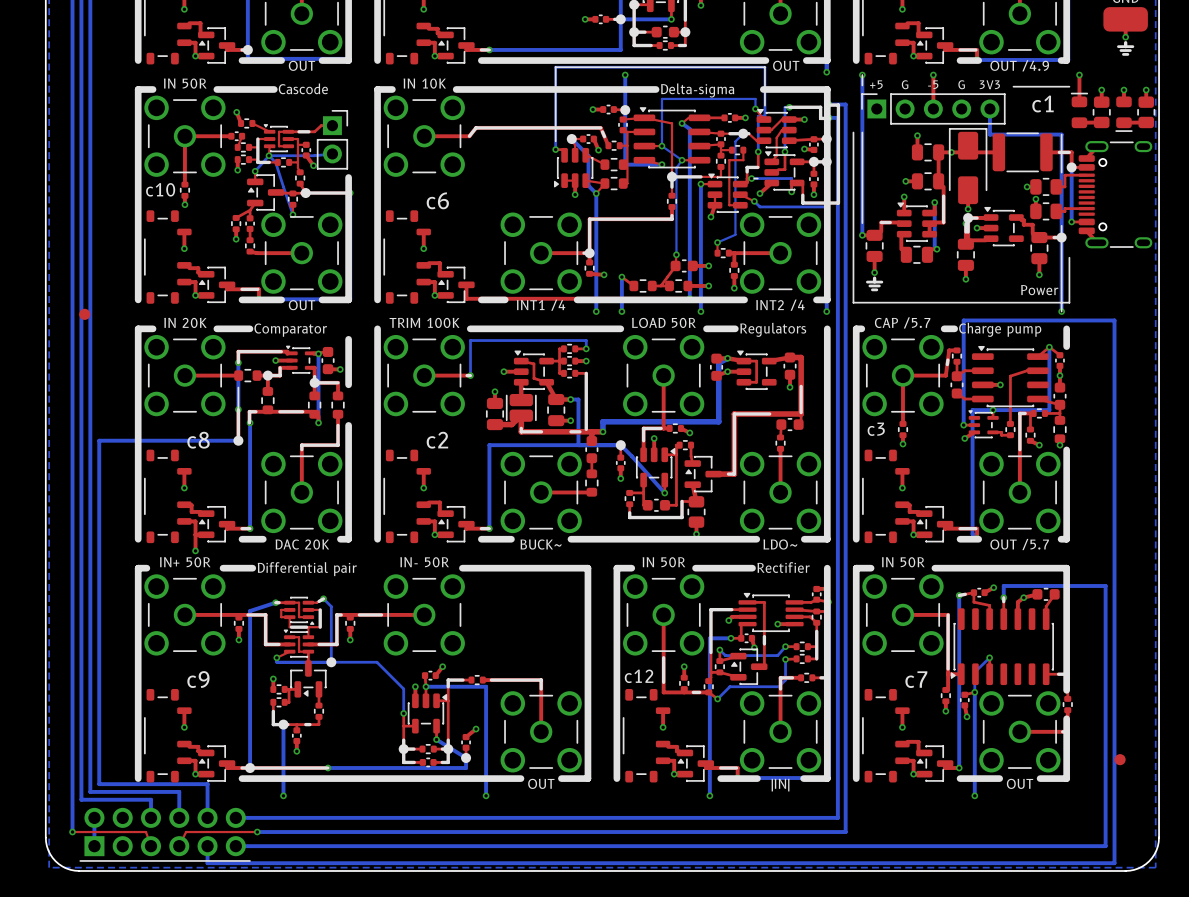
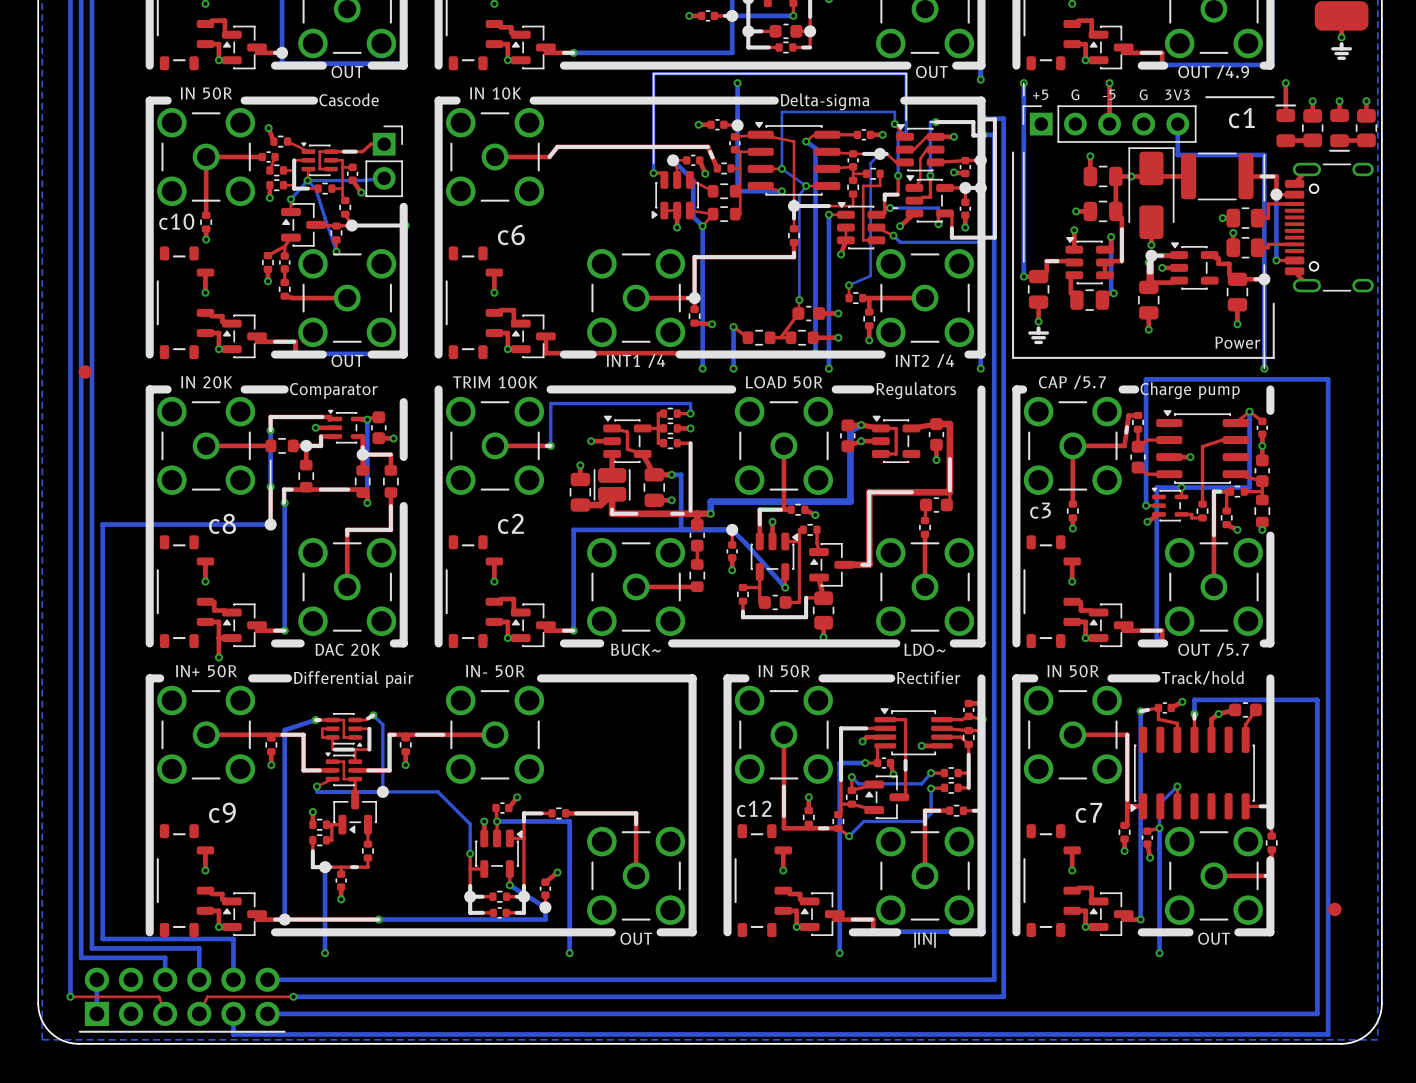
text: none -> Track/hold (1202, 677)
line: (972, 568) (1066, 568) -> none

